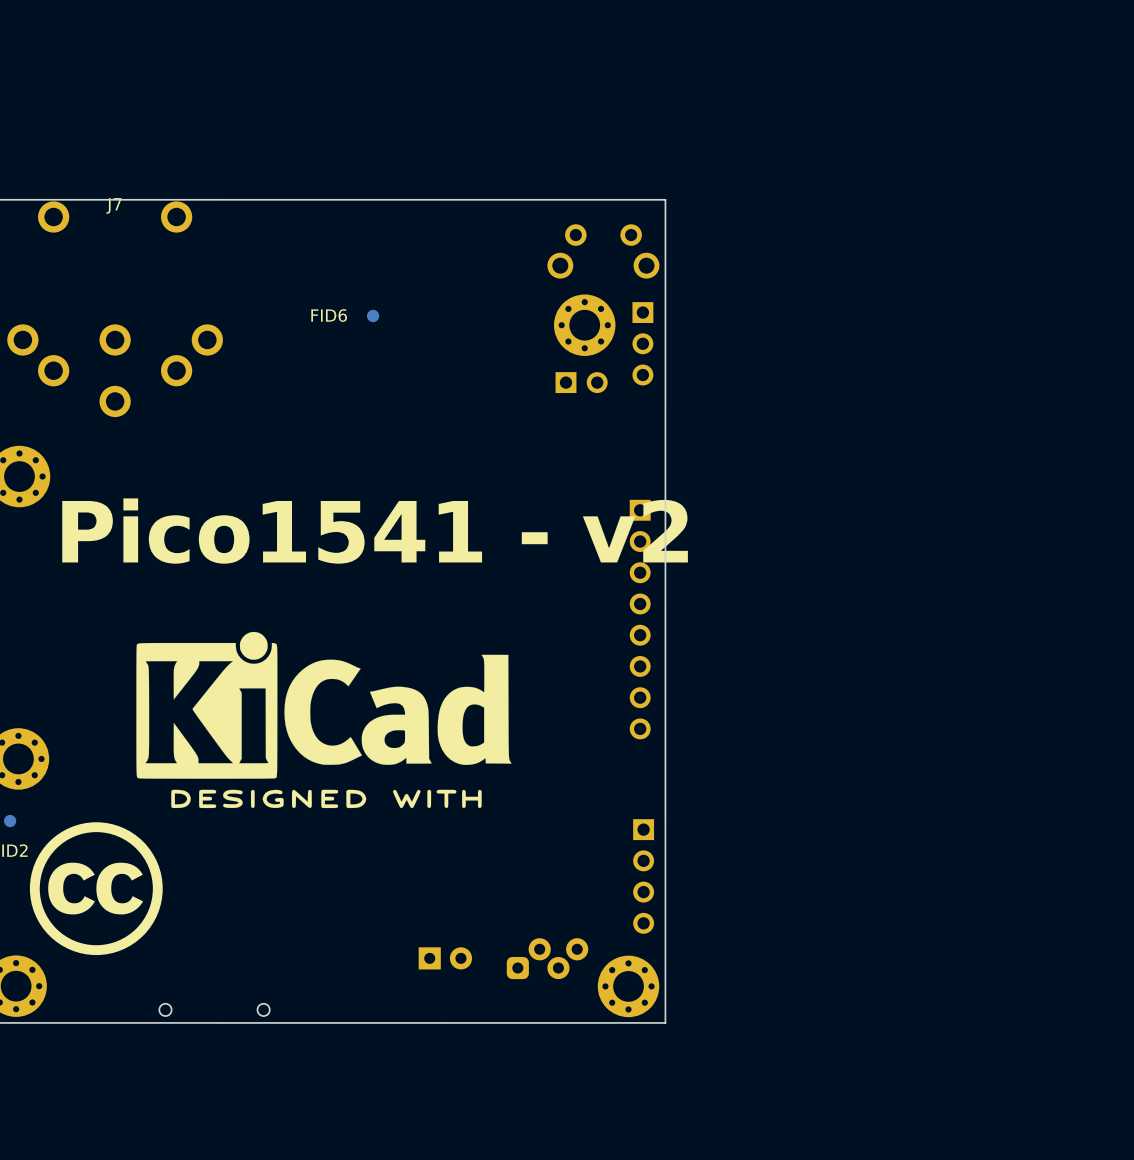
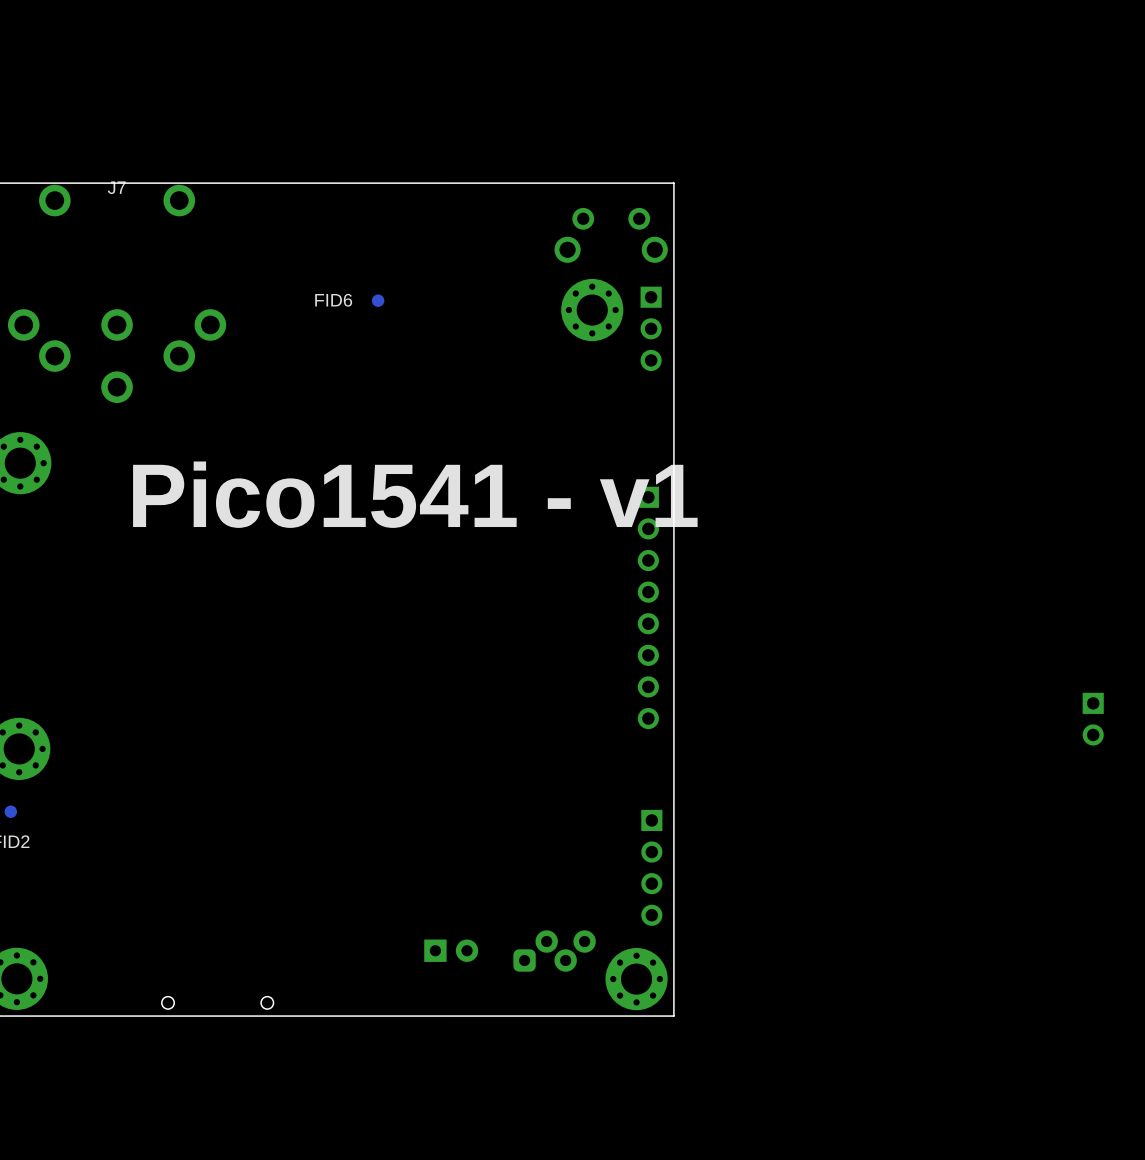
part: (581, 382) -> none
text: Pico1541 - v2 (375, 531) -> Pico1541 - v1 (415, 494)
drawing: [29, 631, 512, 956] -> none
part: none -> (1093, 719)

